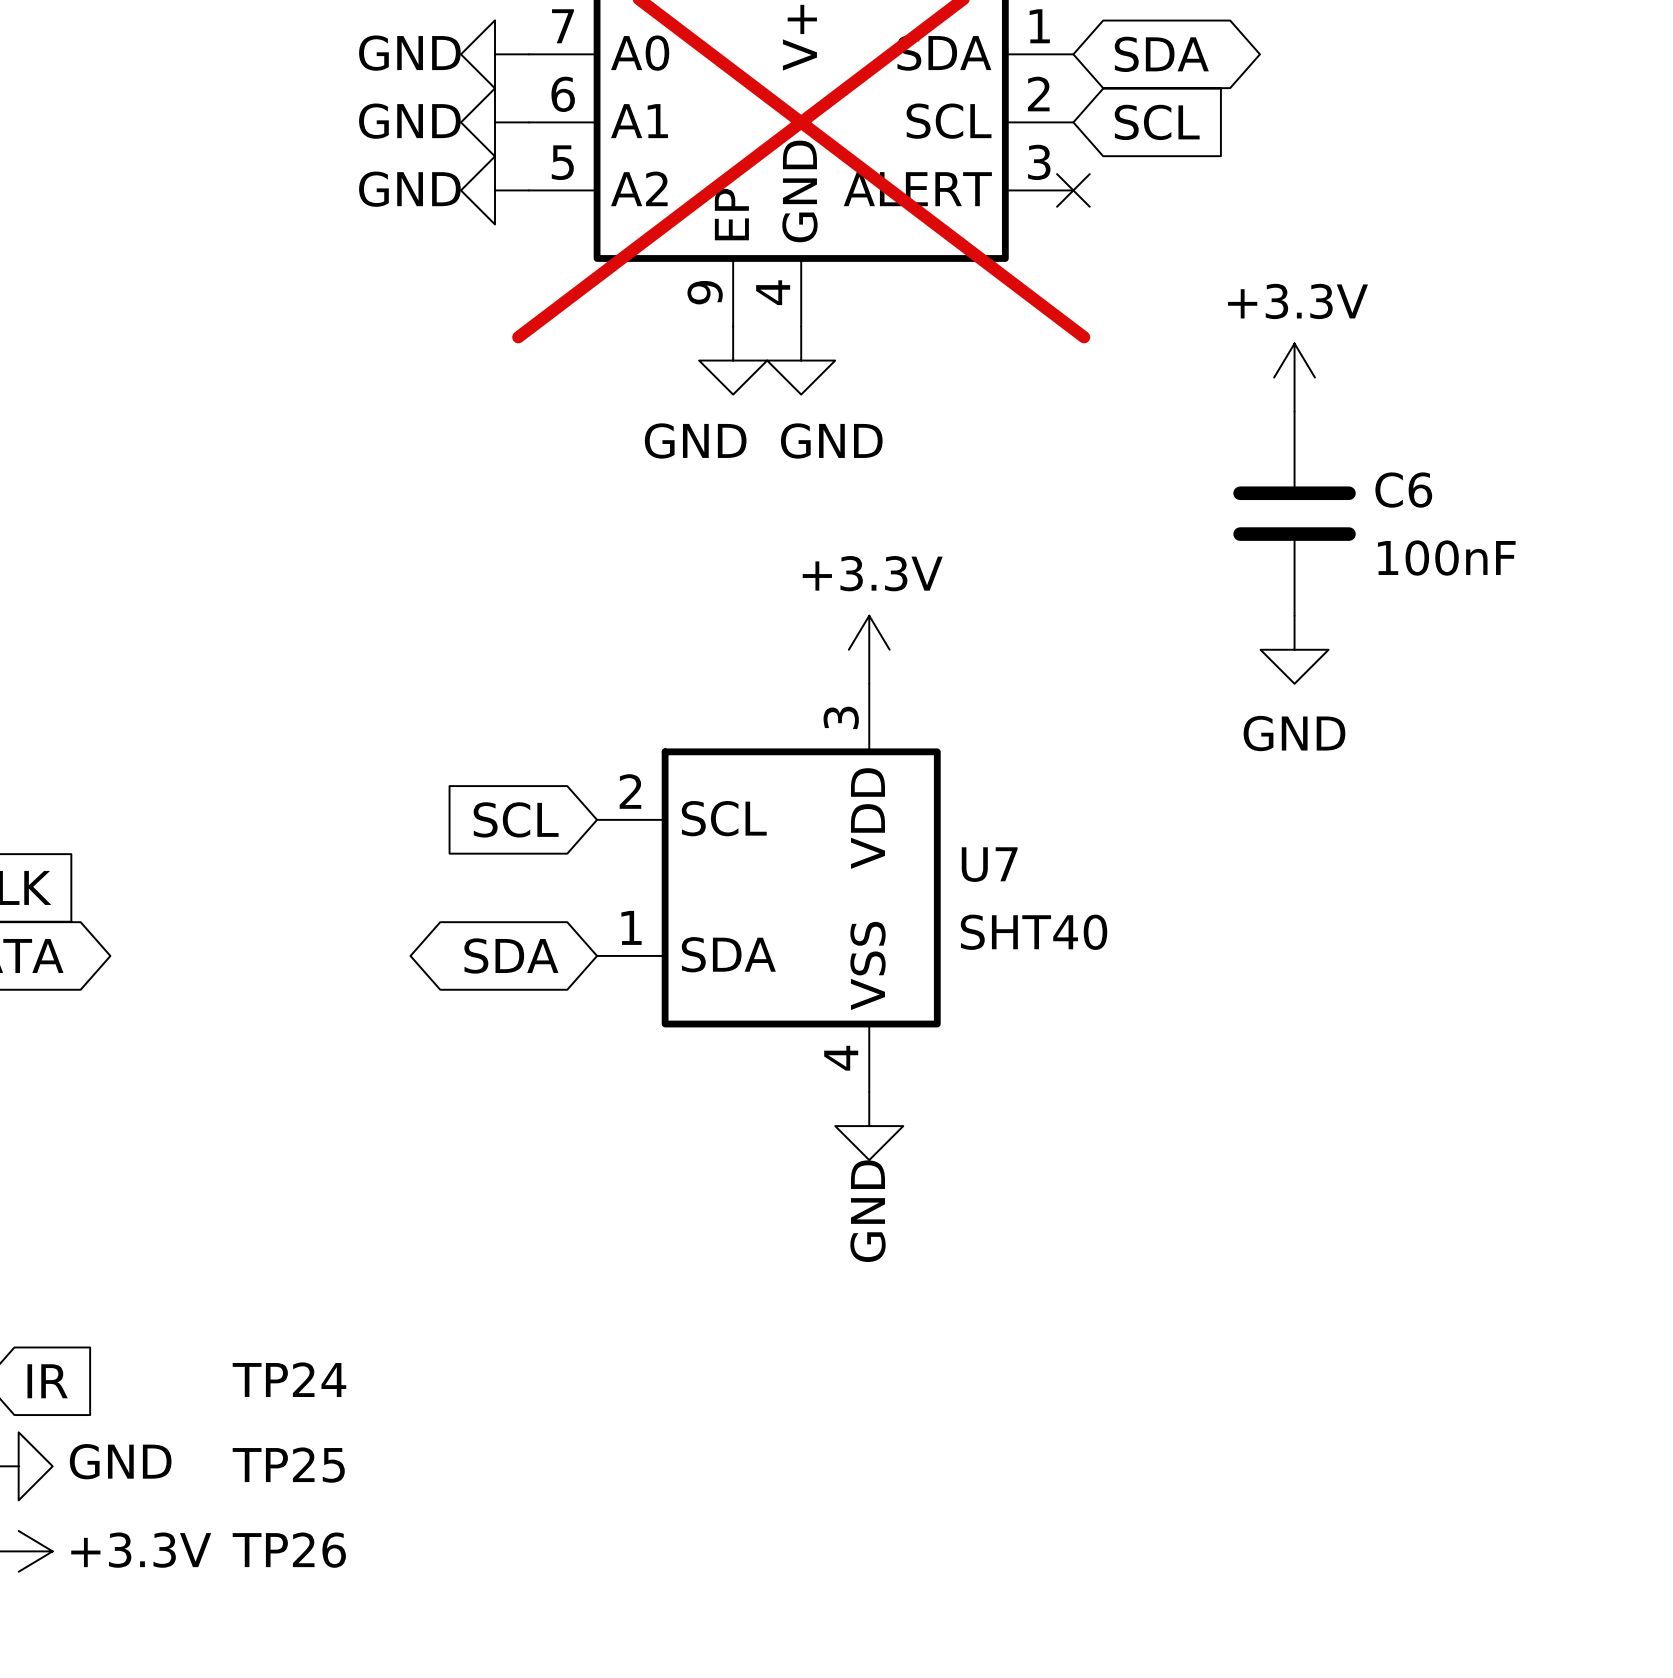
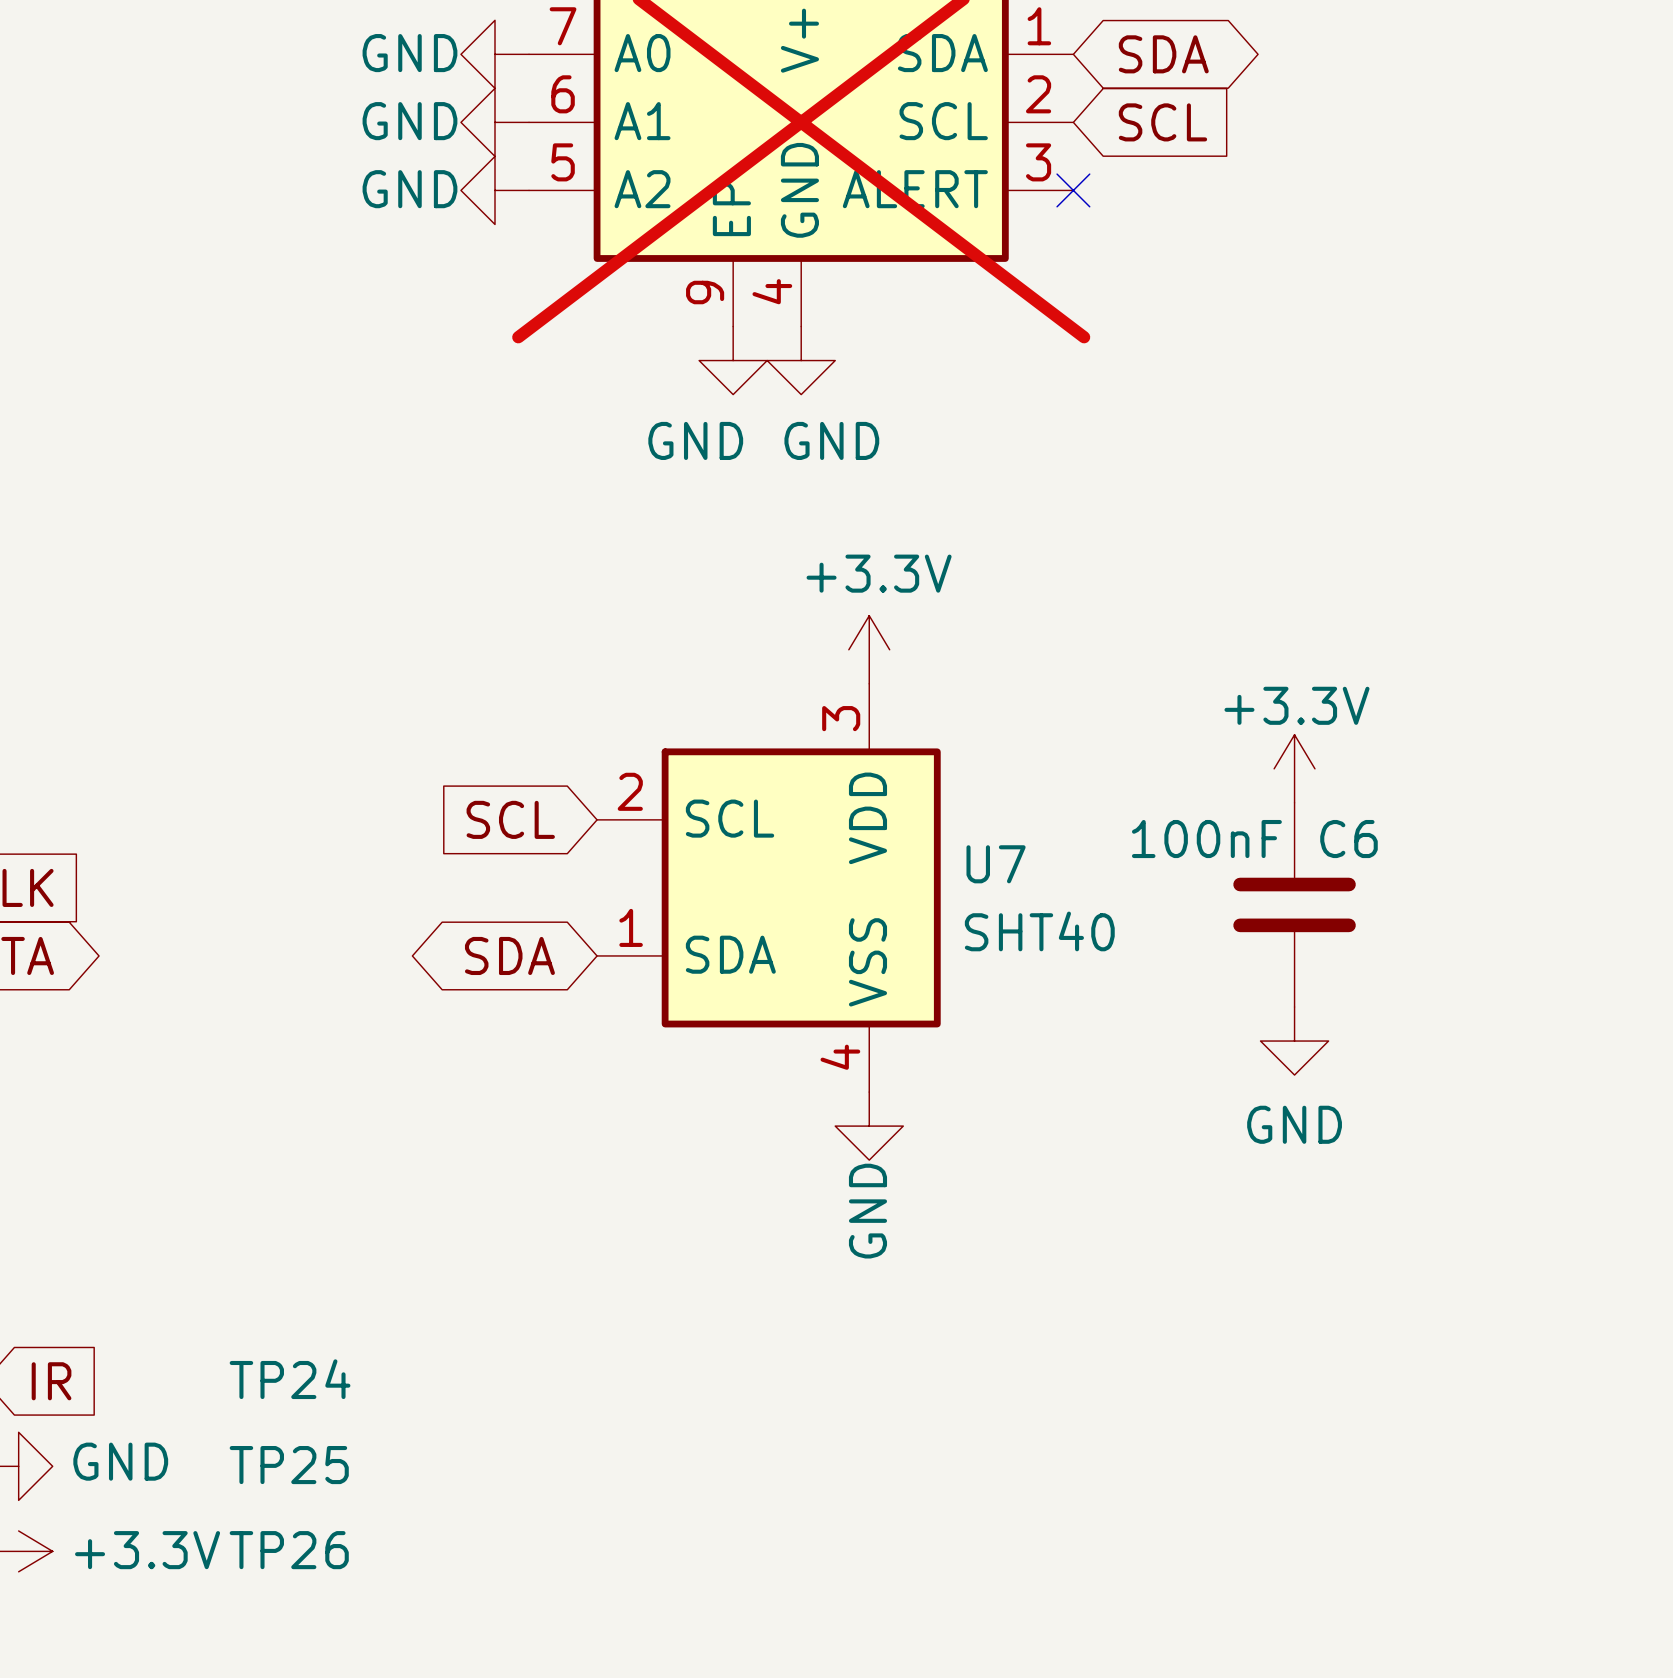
power symbol text position: +3.3V (1298, 301) -> +3.3V (1296, 705)
power symbol position: +3.3V (1294, 377) -> +3.3V (1294, 768)
C6 name position: C6 (1403, 490) -> C6 (1348, 839)
C6 position: (1294, 513) -> (1294, 904)
C6 value position: 100nF (1446, 558) -> 100nF (1206, 839)
power symbol position: GND (1294, 649) -> GND (1294, 1041)

